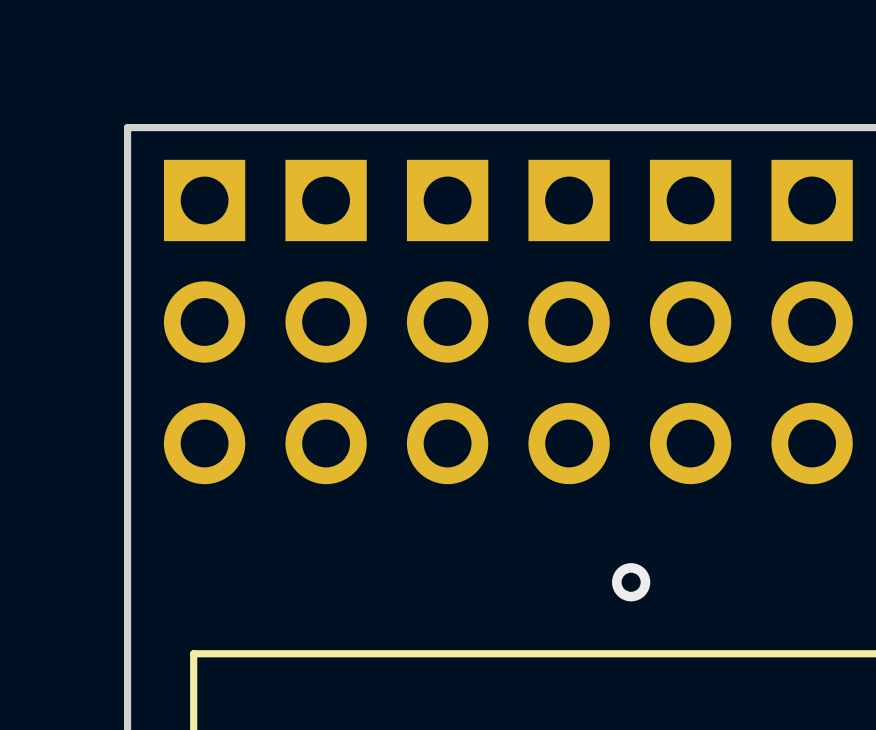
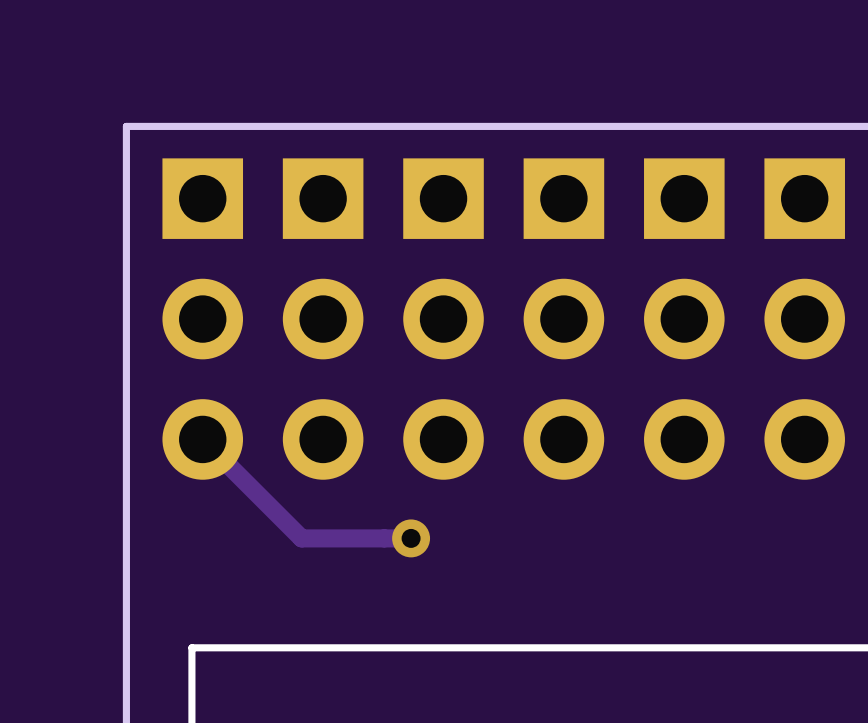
track: none -> (202, 439) (301, 538) (411, 538)
via position: (631, 582) -> (411, 538)

